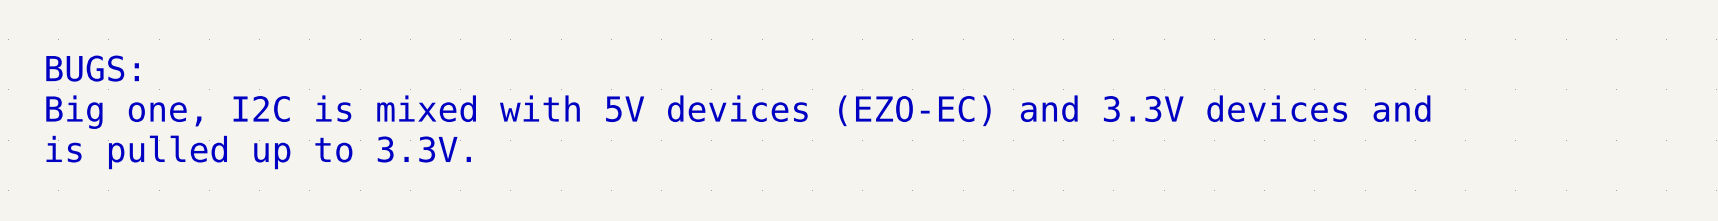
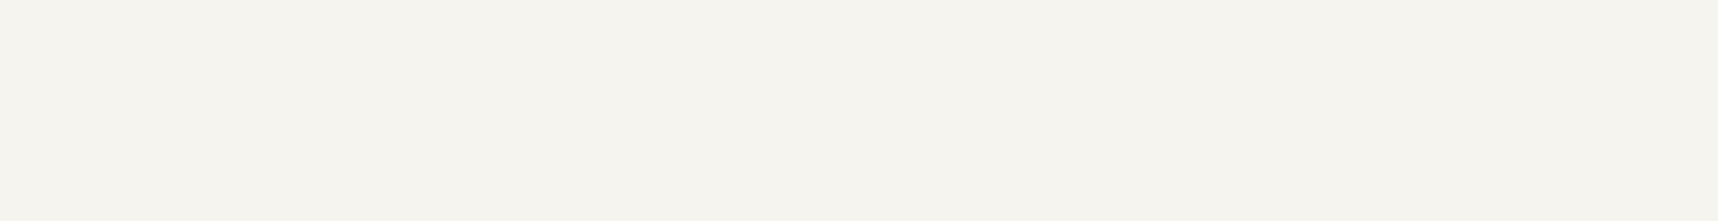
text: BUGS: (92, 68) -> none
text: Big one, I2C is mixed with 5V devices (EZO-EC) and 3.3V devices and (738, 112) -> none
text: is pulled up to 3.3V. (258, 152) -> none

